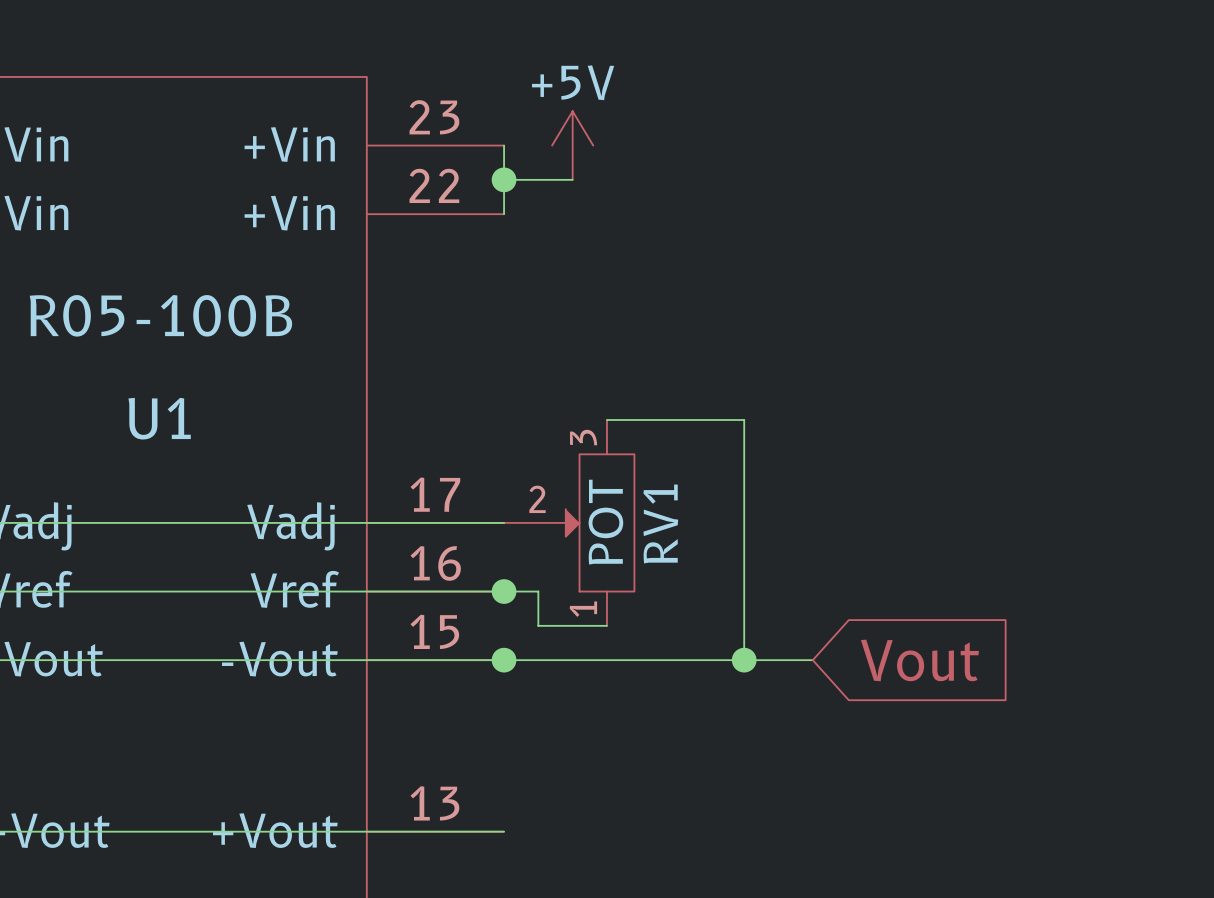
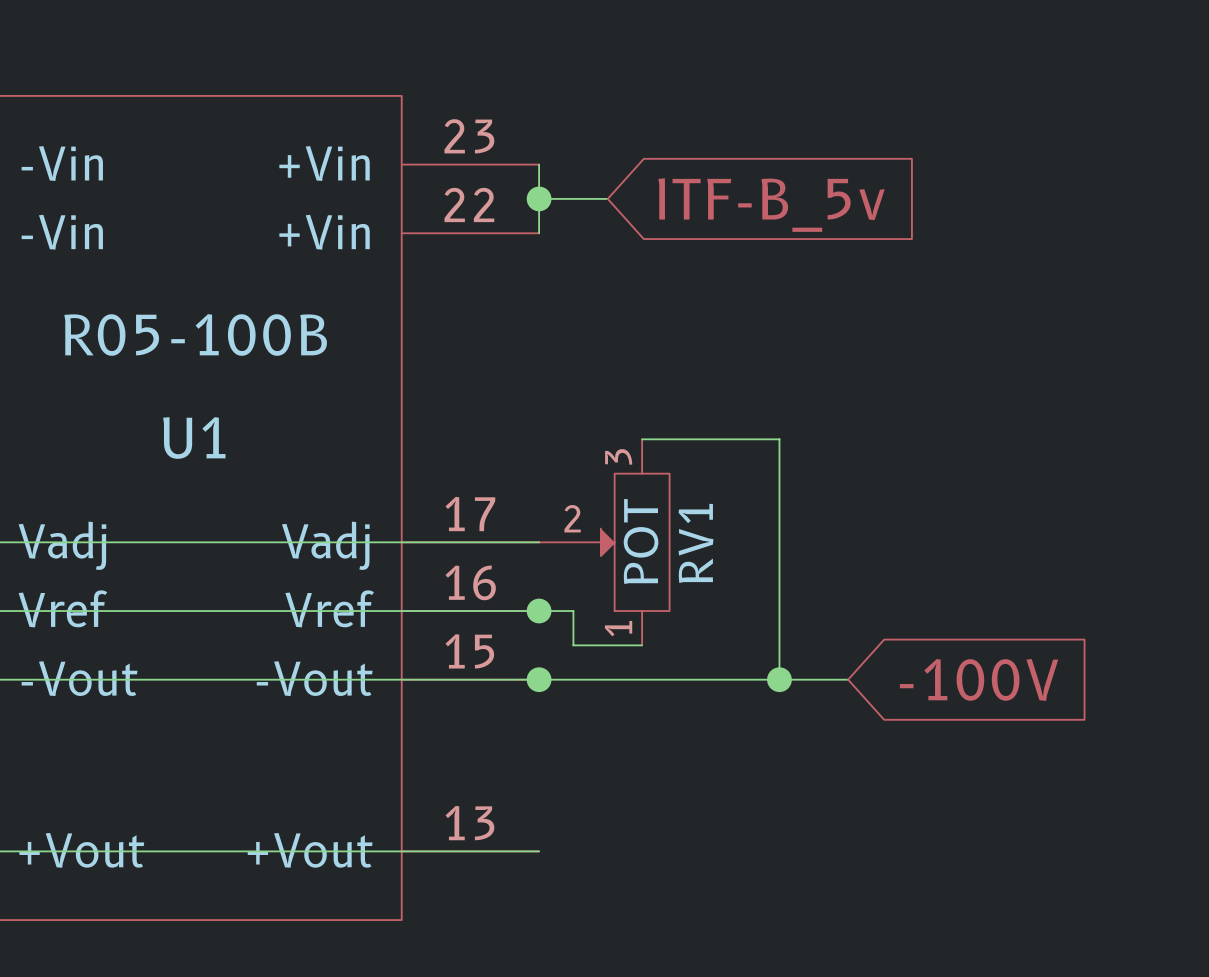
power symbol: +5V (572, 145) -> none
global label: none -> ITF-B_5v (771, 205)
global label: Vout (919, 660) -> -100V (979, 679)

